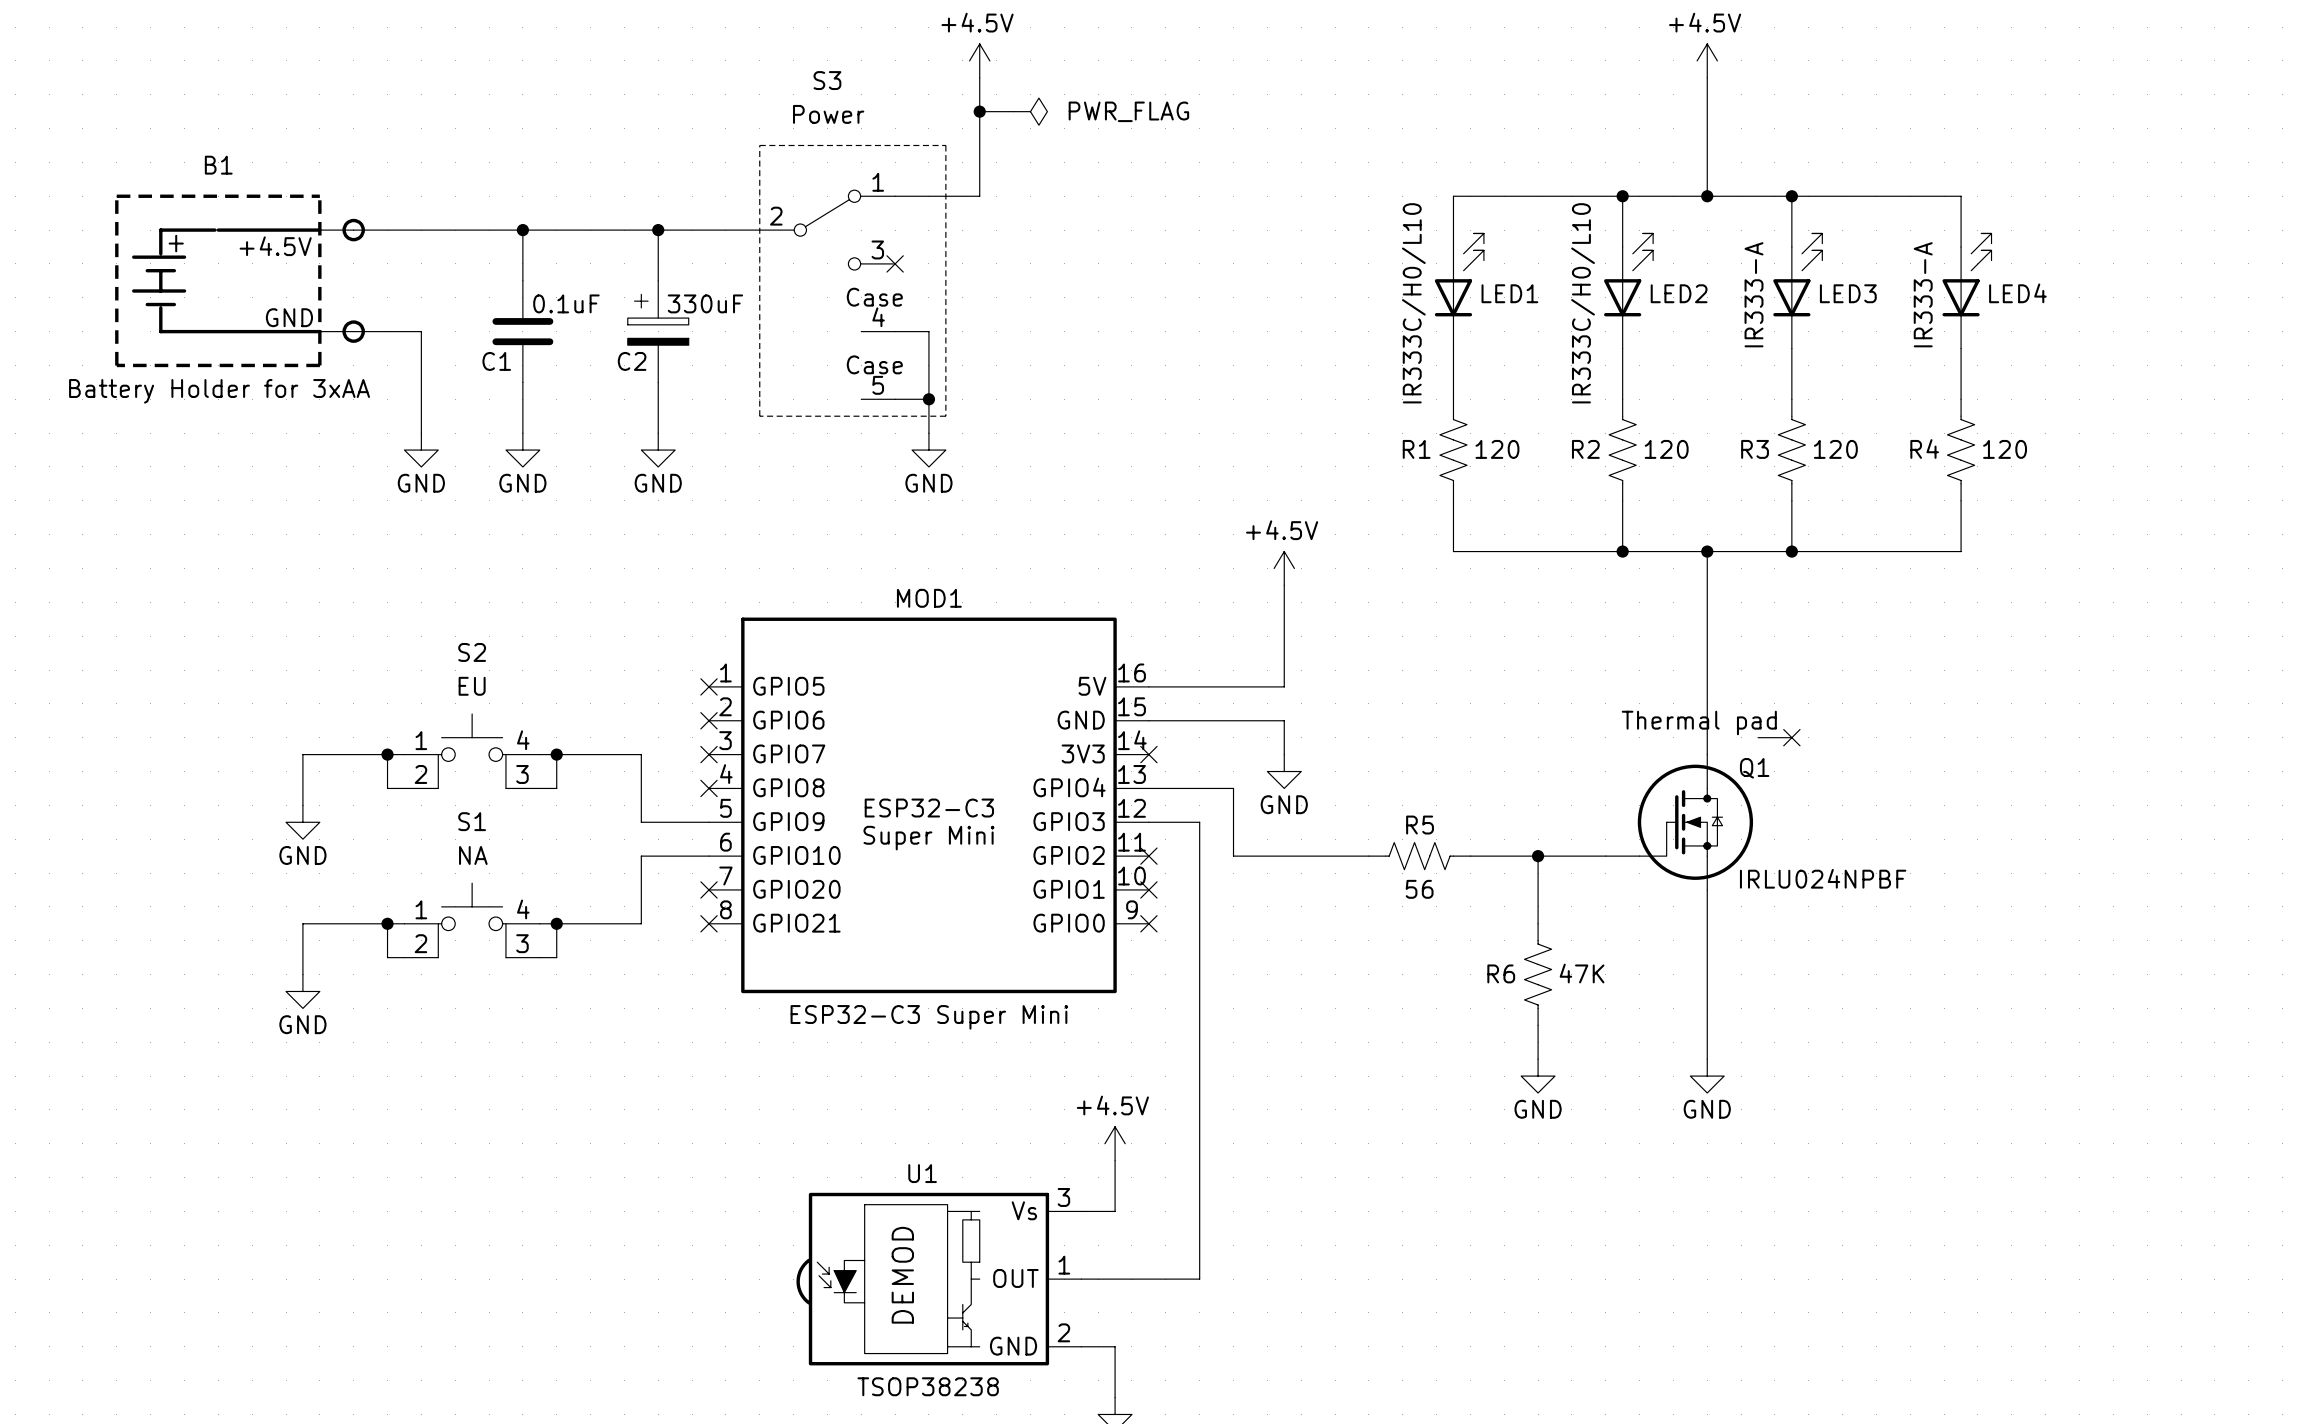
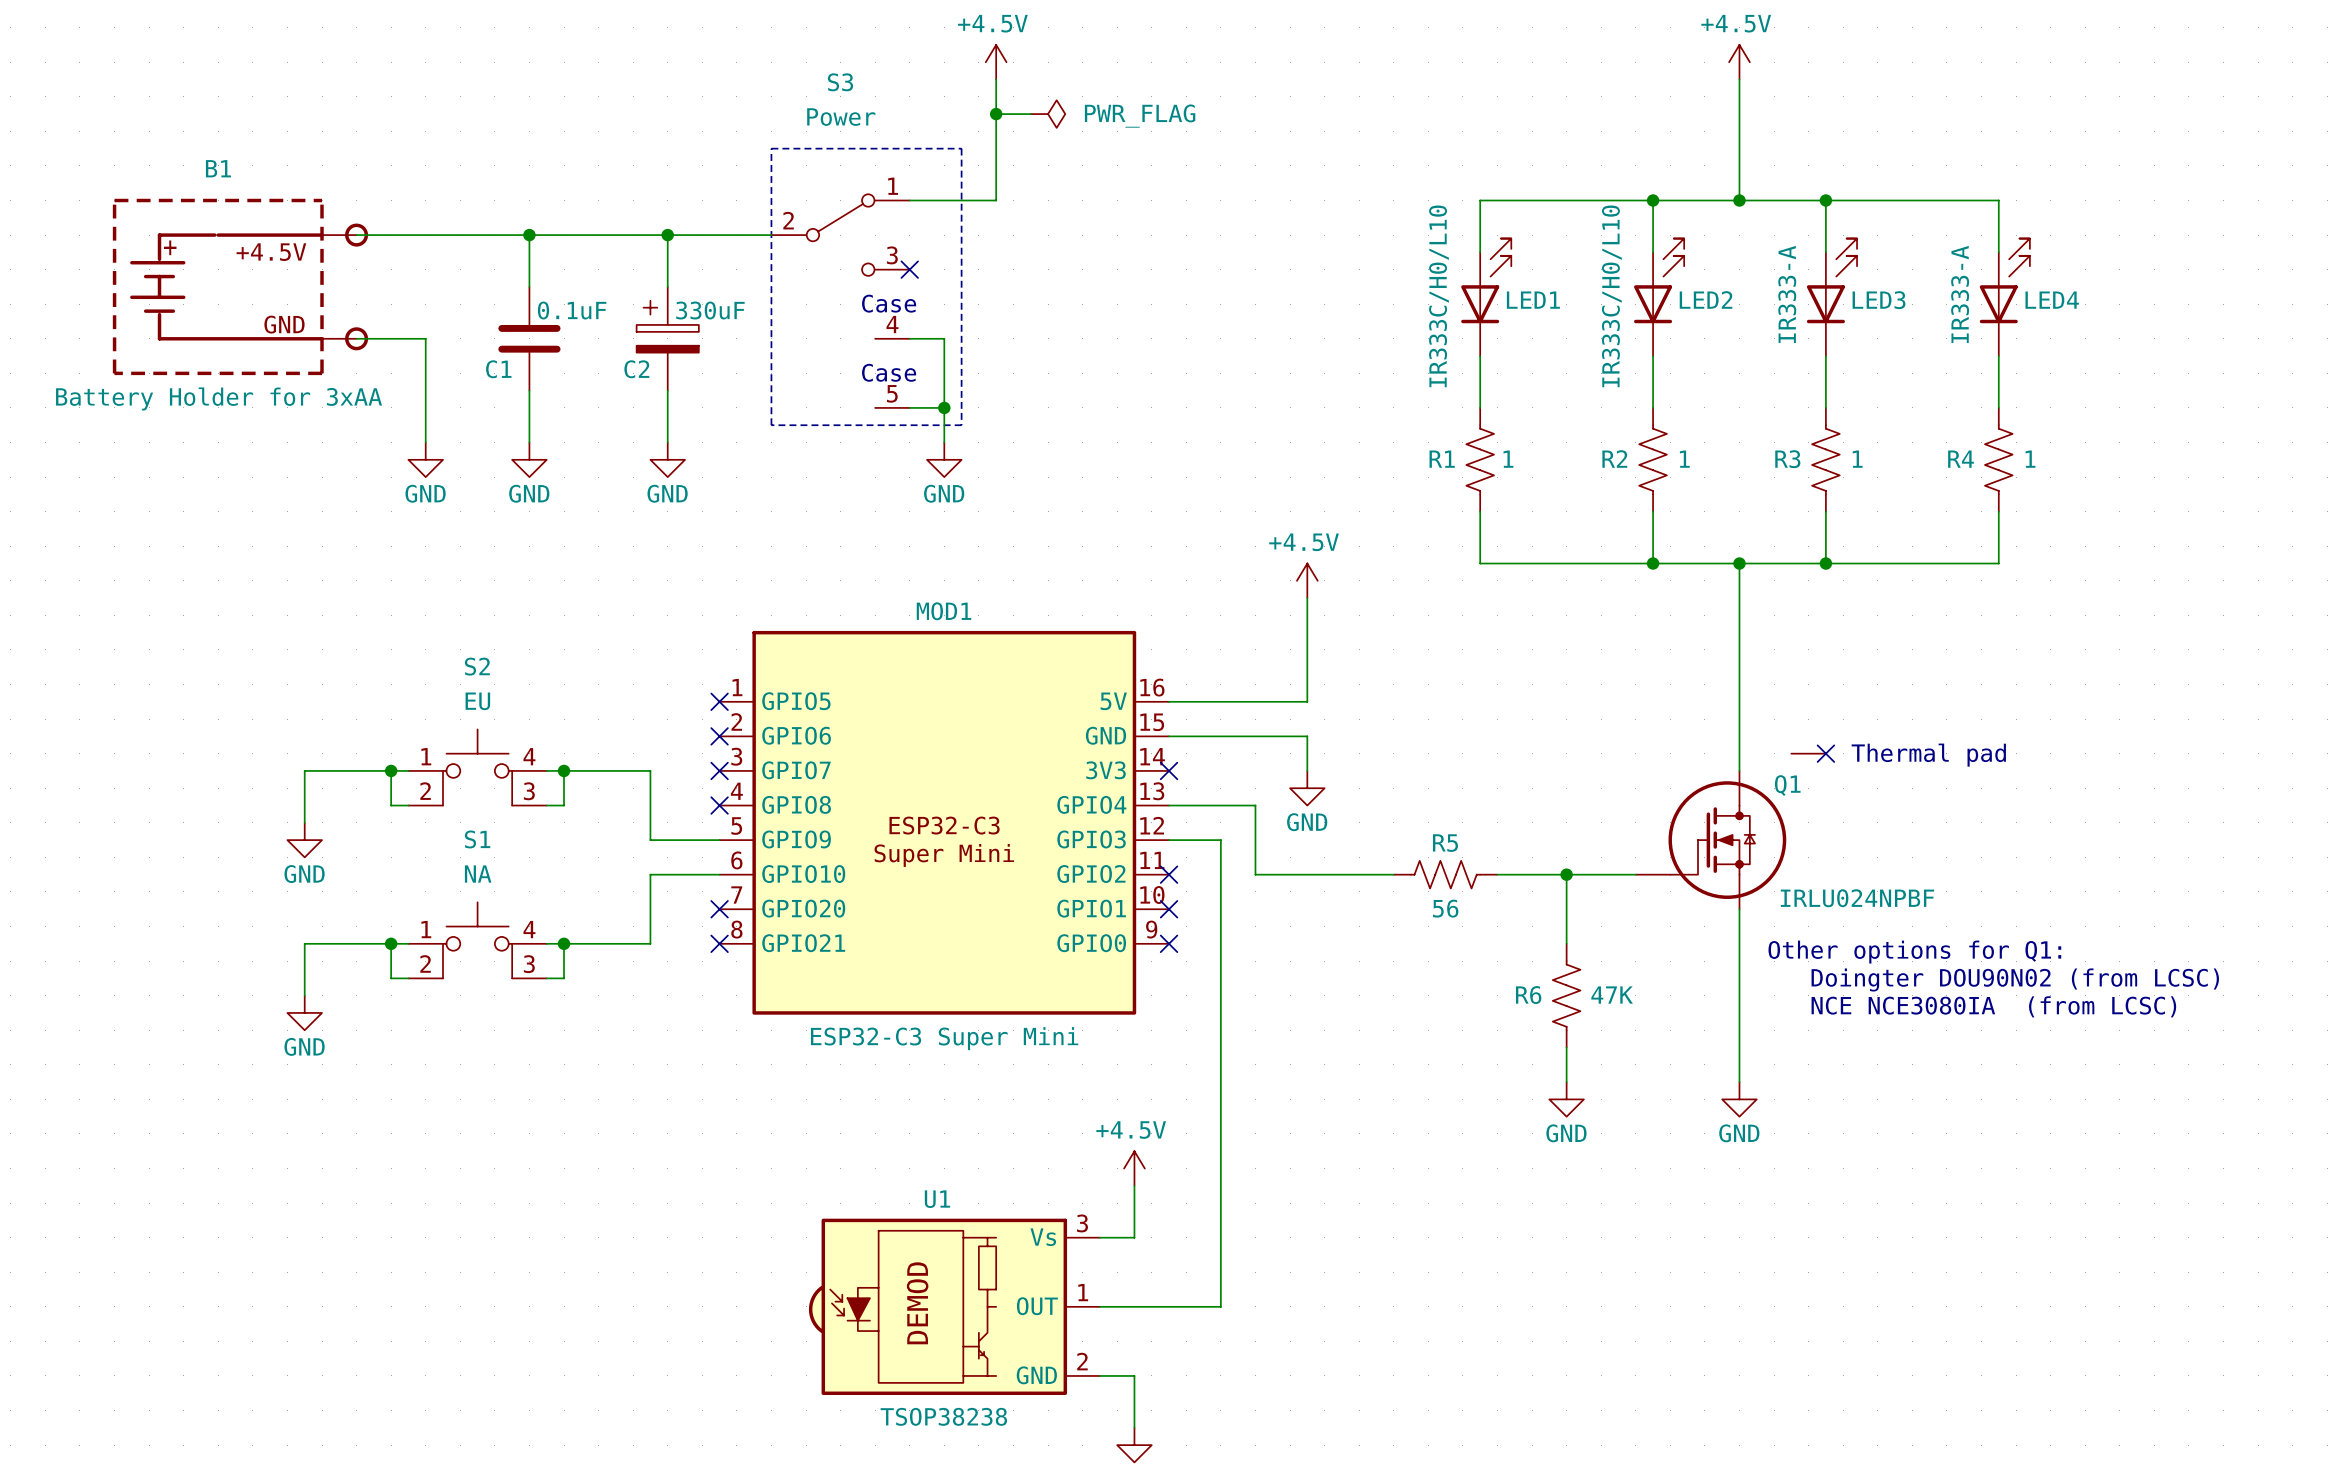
R1 value: 120 (1497, 449) -> 1 (1508, 459)
R2 value: 120 (1666, 449) -> 1 (1684, 459)
R3 value: 120 (1835, 449) -> 1 (1857, 459)
R4 value: 120 (2005, 449) -> 1 (2030, 459)
text position: Thermal pad (1699, 723) -> Thermal pad (1928, 755)
text: none -> Other options for Q1: (1914, 952)
text: none -> Doingter DOU90N02 (from LCSC) (2015, 979)
text: none -> NCE NCE3080IA (from LCSC) (1993, 1006)

